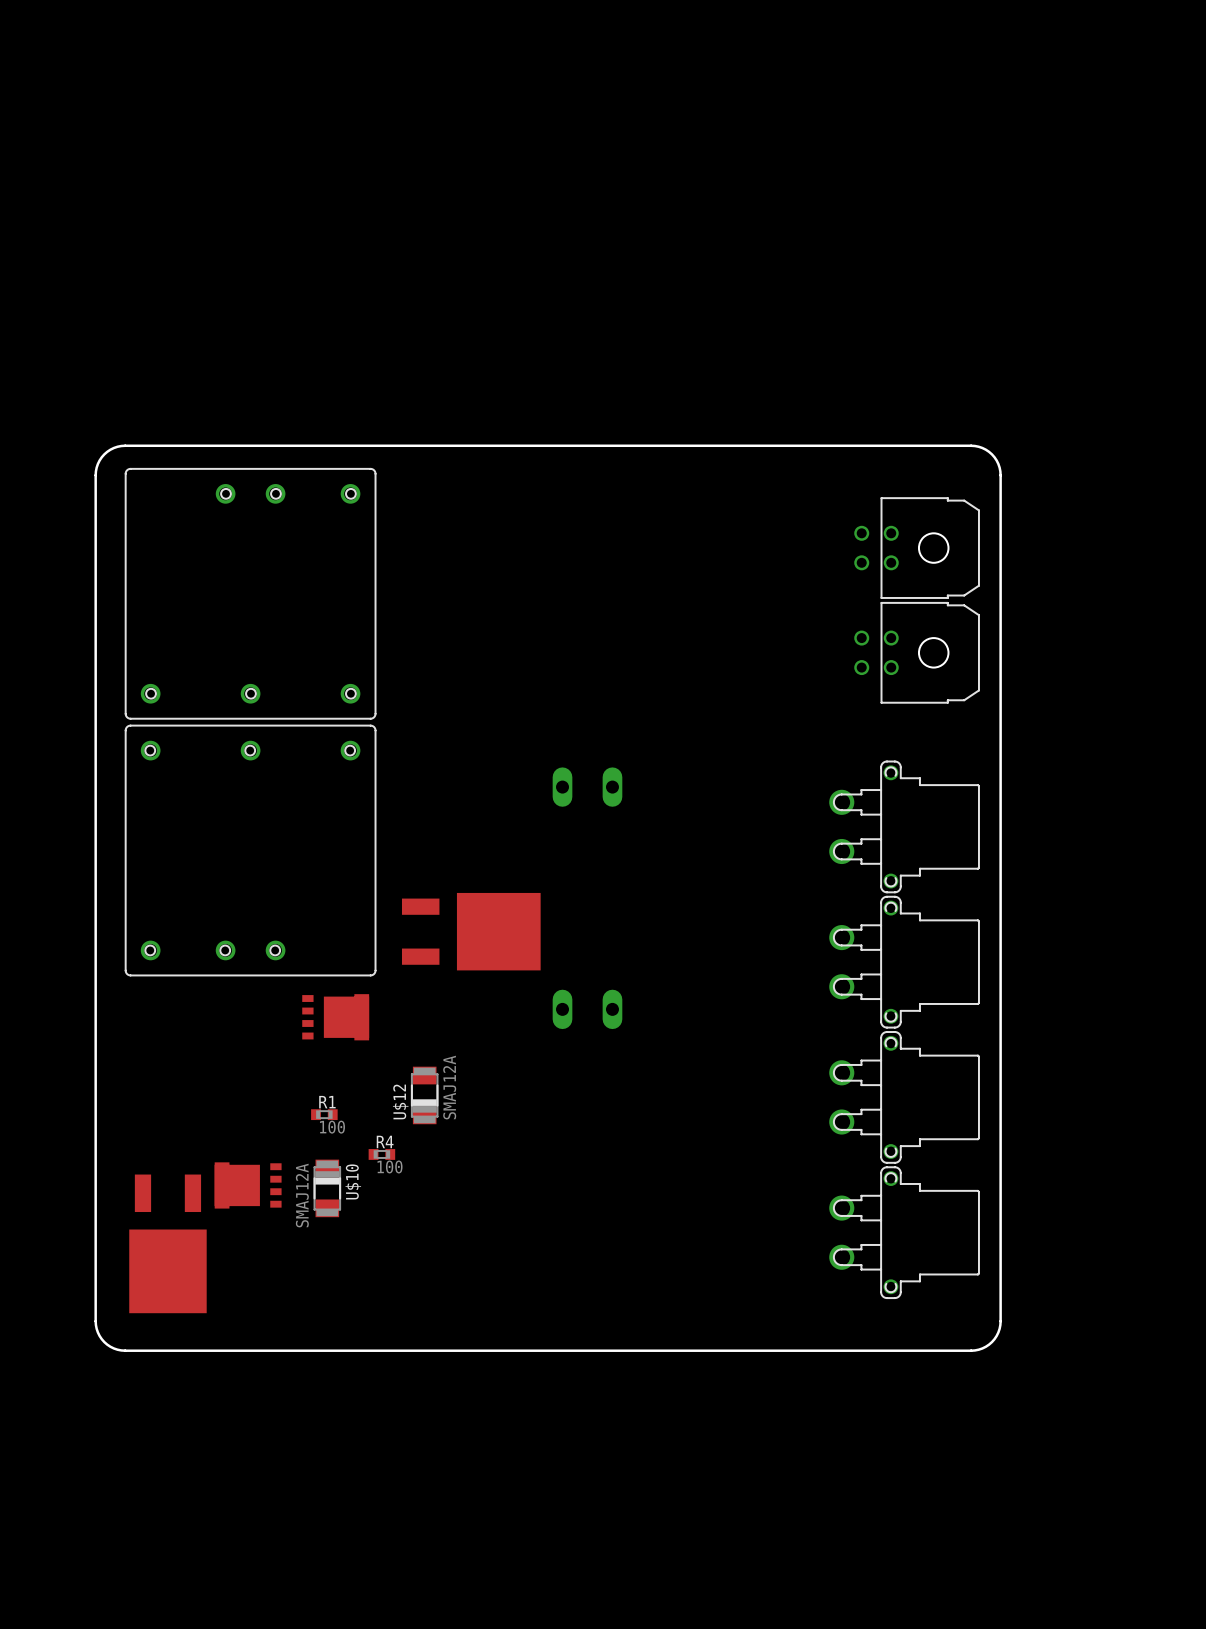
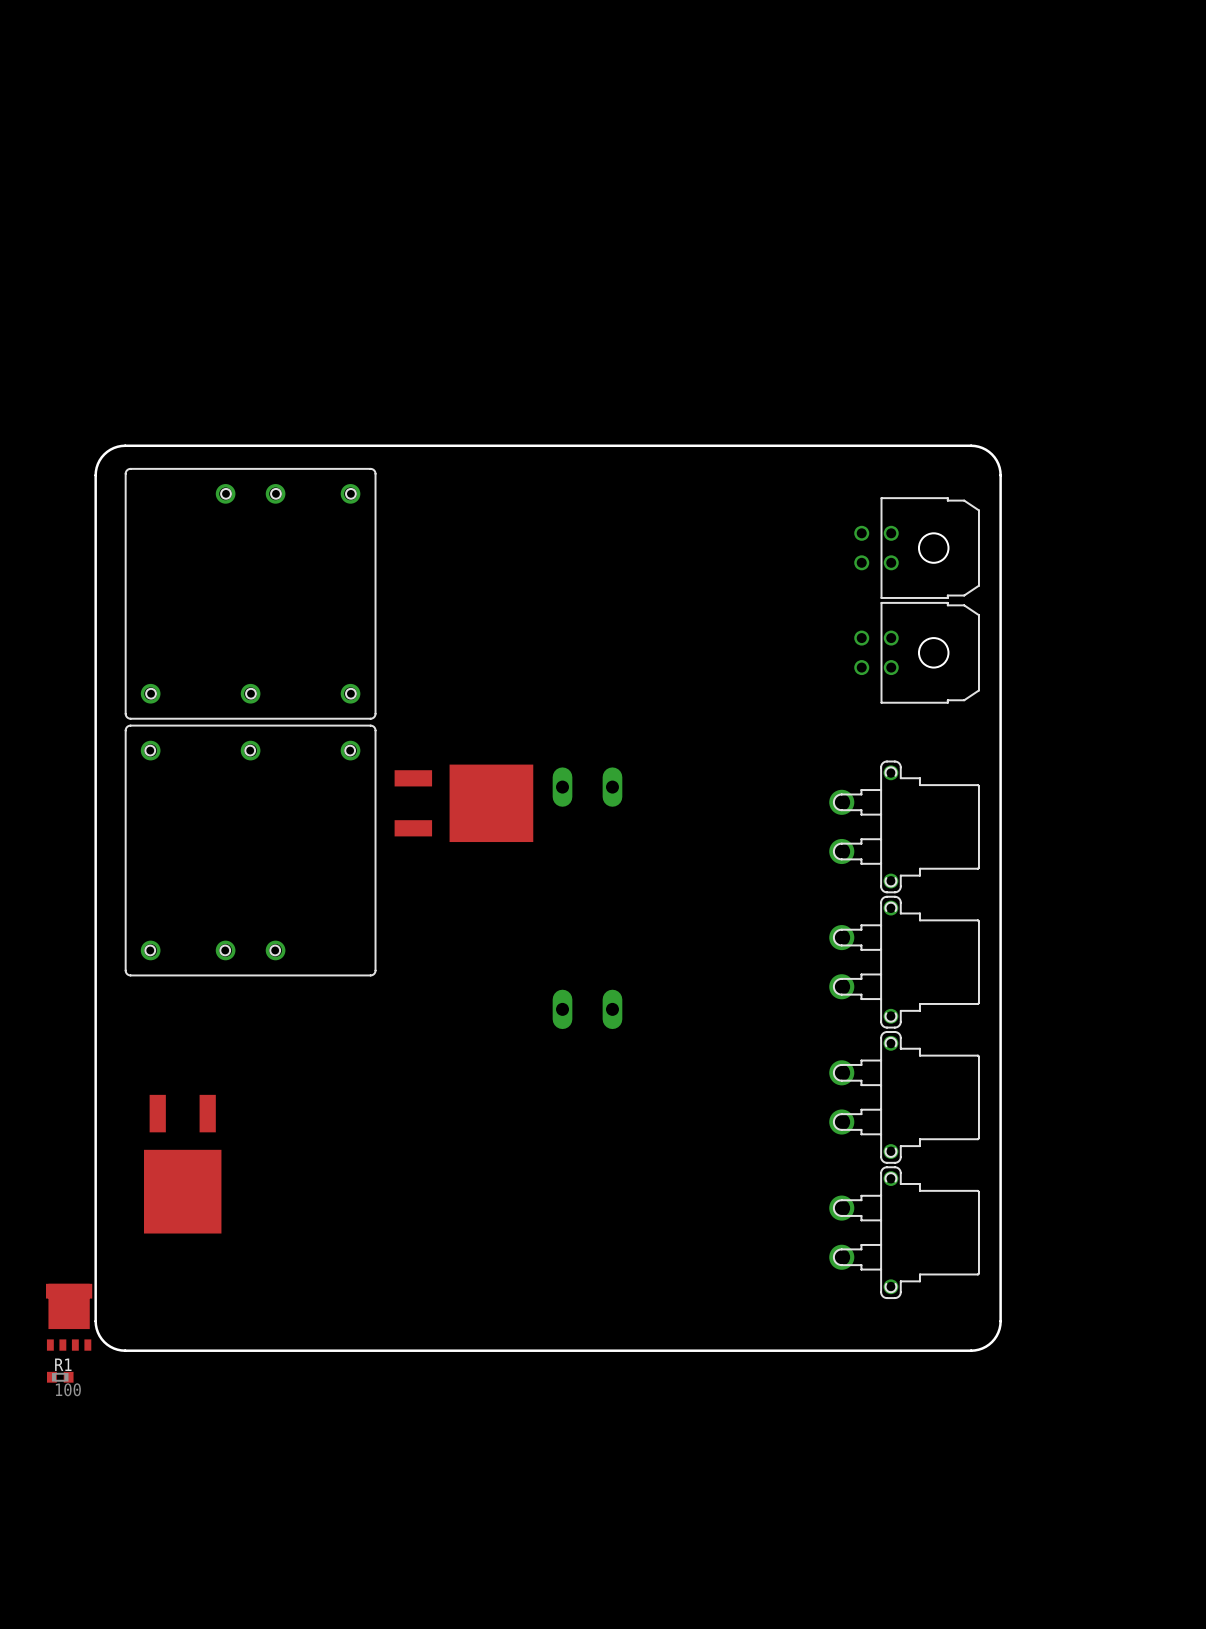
part position: (471, 931) -> (463, 803)
part: (335, 1017) -> none
U$12: SMAJ12A (424, 1095) -> none
R1 position: (324, 1114) -> (60, 1377)
R4: 100 (381, 1154) -> none
part: (248, 1185) -> none
U$10: SMAJ12A (327, 1188) -> none
part position: (167, 1243) -> (182, 1164)
part: none -> (69, 1317)

